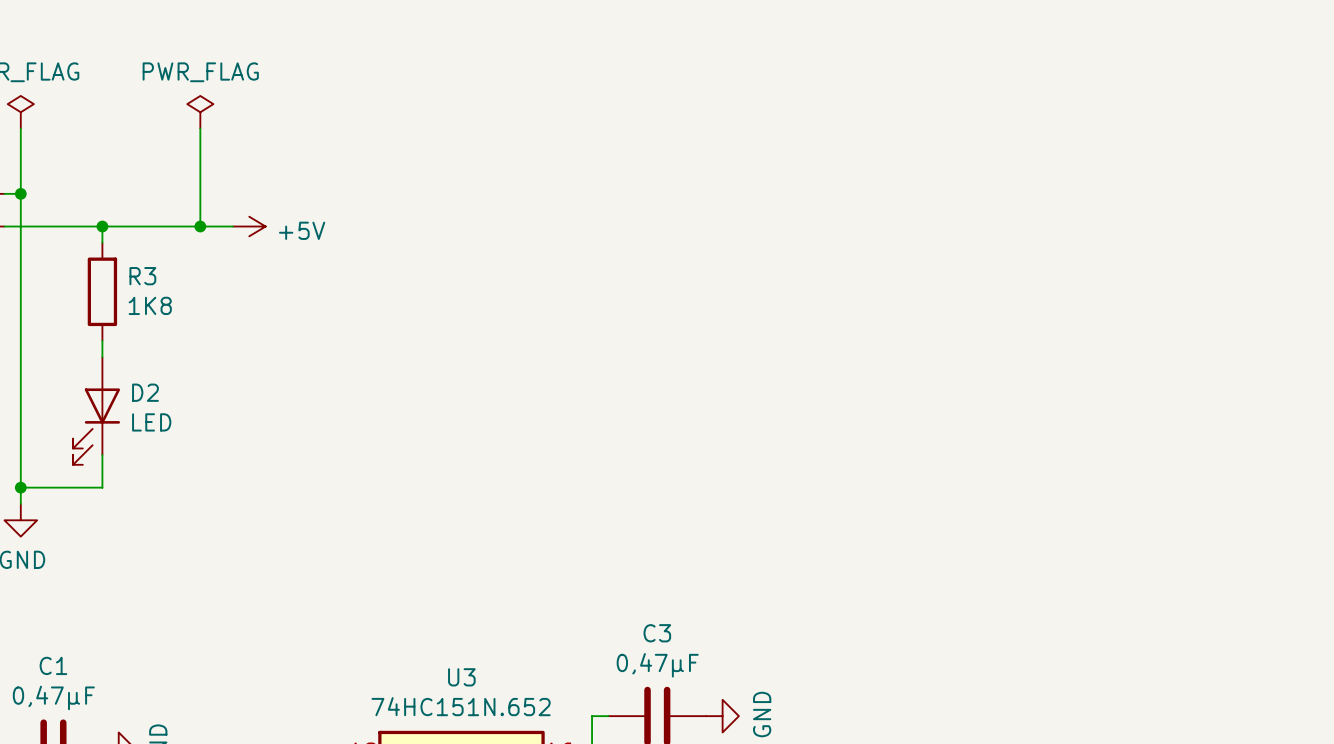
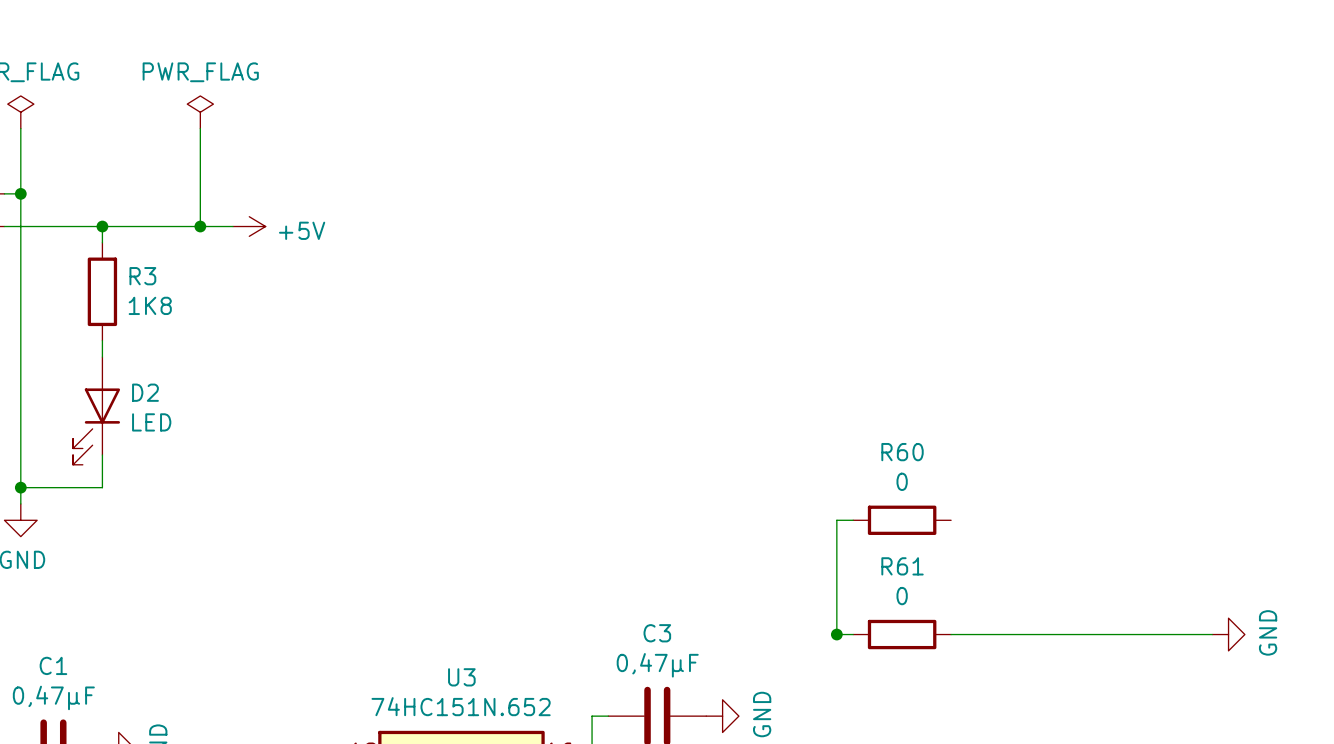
wire: none -> (853, 520) (836, 520) (836, 634) (853, 634)
R60: none -> 0 (902, 520)
junction: none -> (836, 634)
R61: none -> 0 (902, 634)
wire: none -> (951, 634) (1212, 634)
power symbol: none -> GND (1228, 634)

